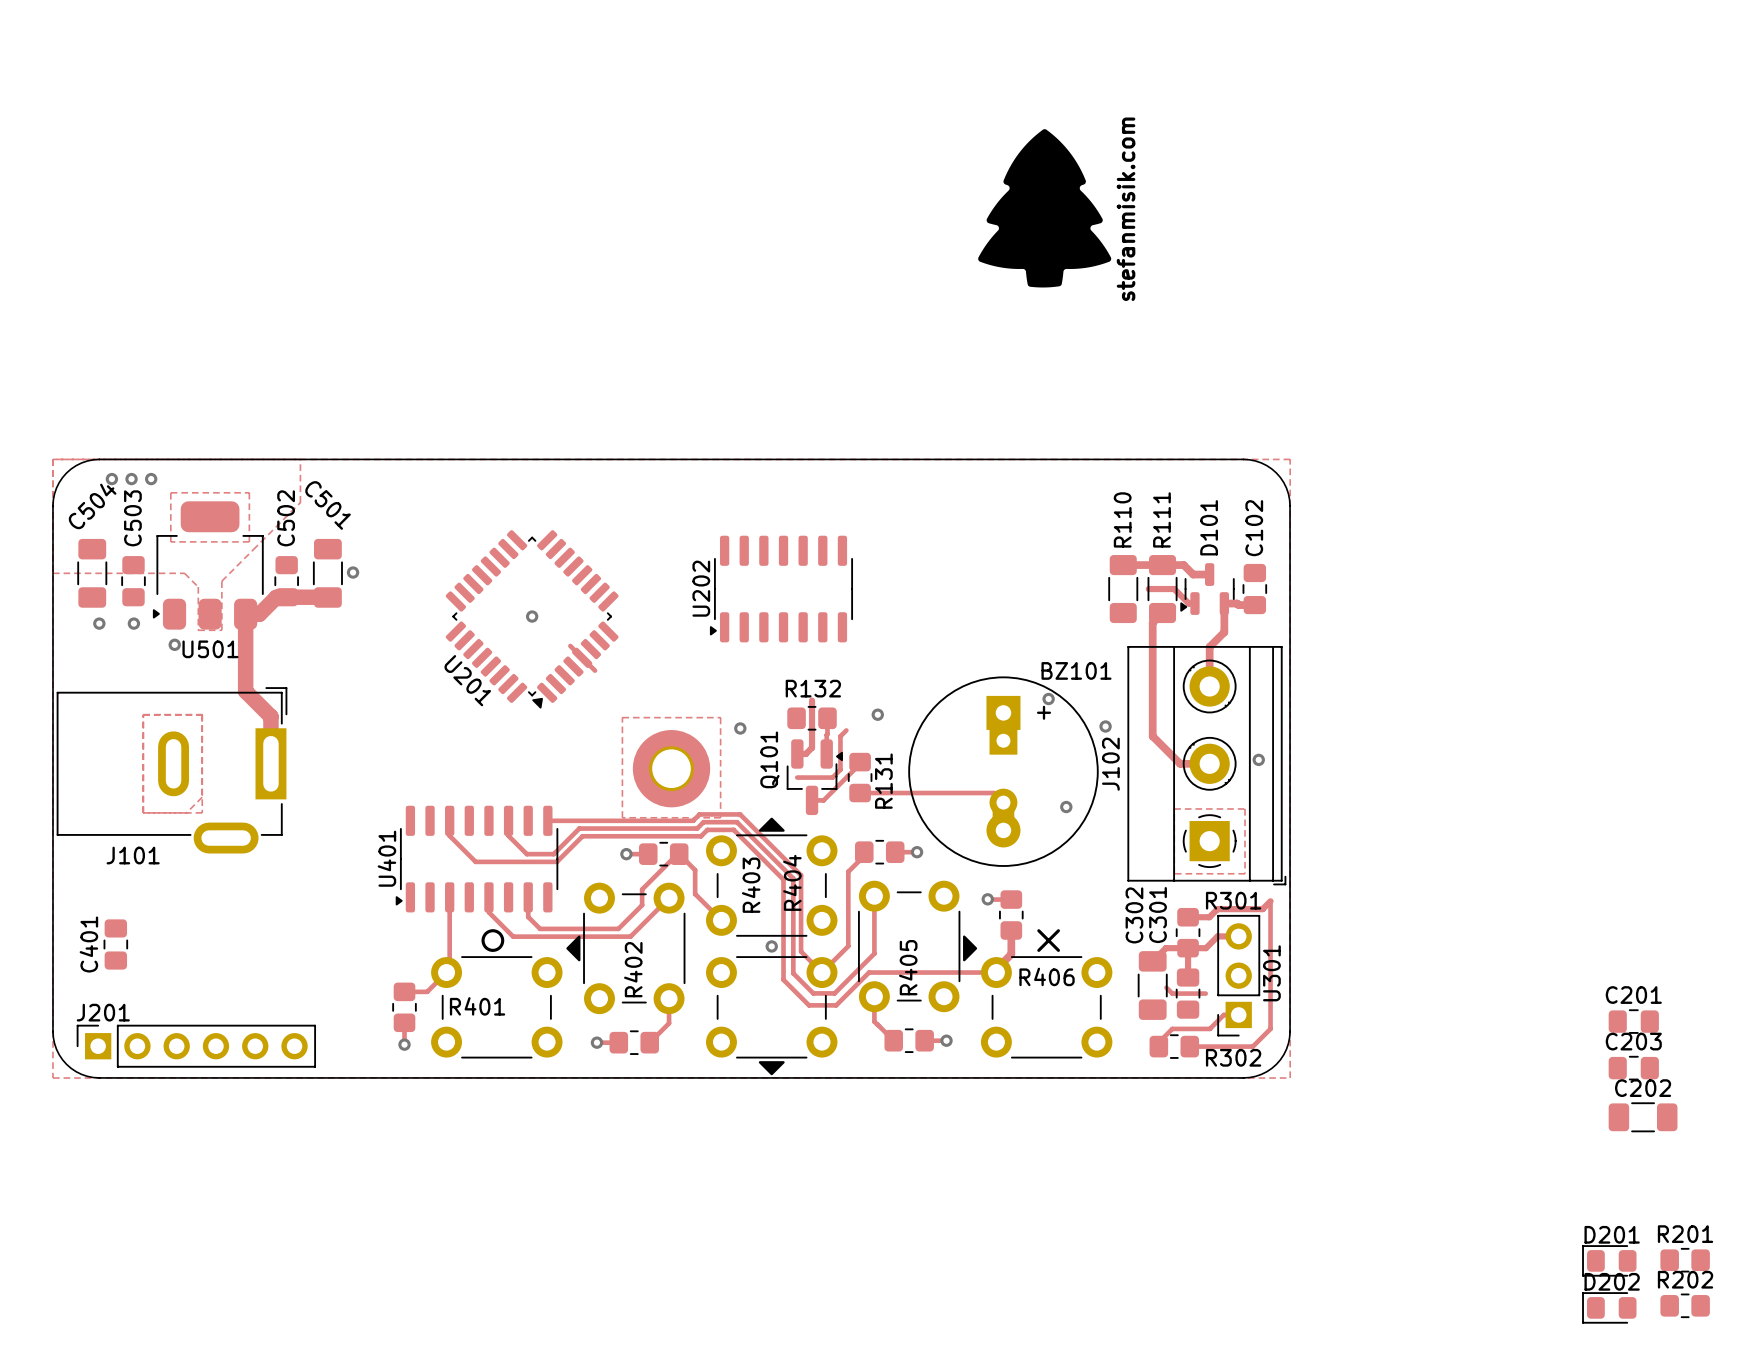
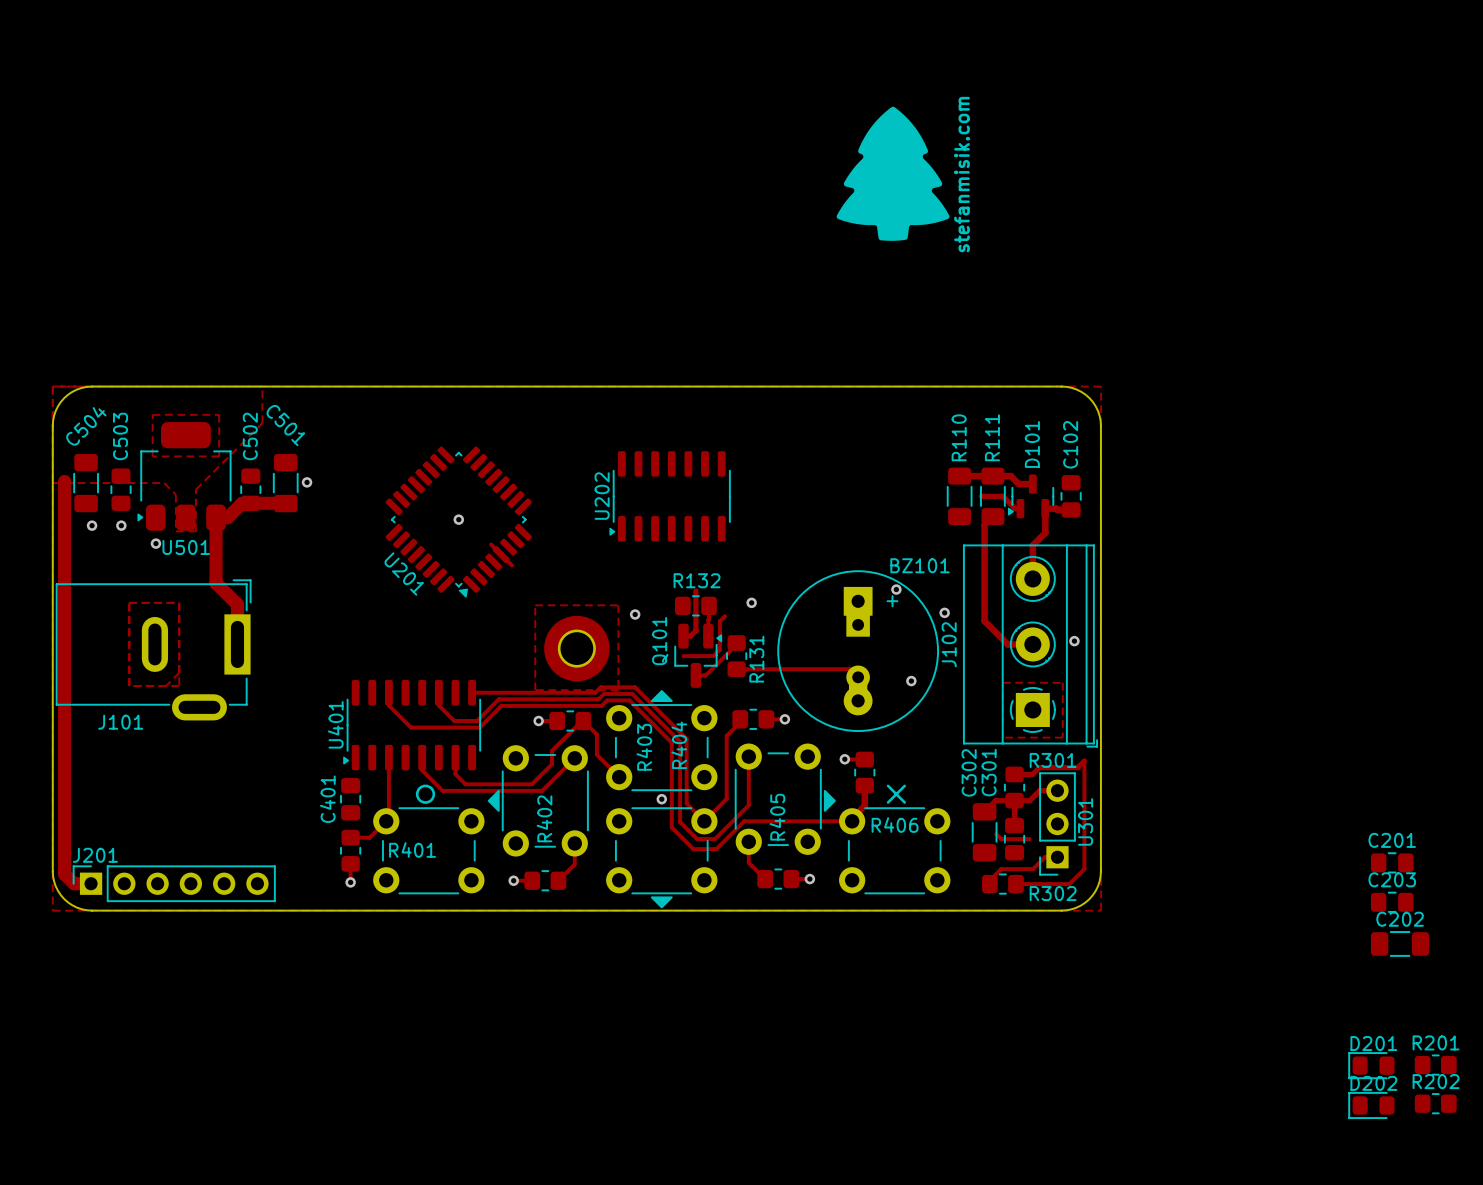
via: (111, 479) -> none
via: (131, 479) -> none
via: (151, 479) -> none
track: none -> (64, 481) (64, 872) (74, 883) (91, 883)
C401 position: (115, 944) -> (350, 799)

